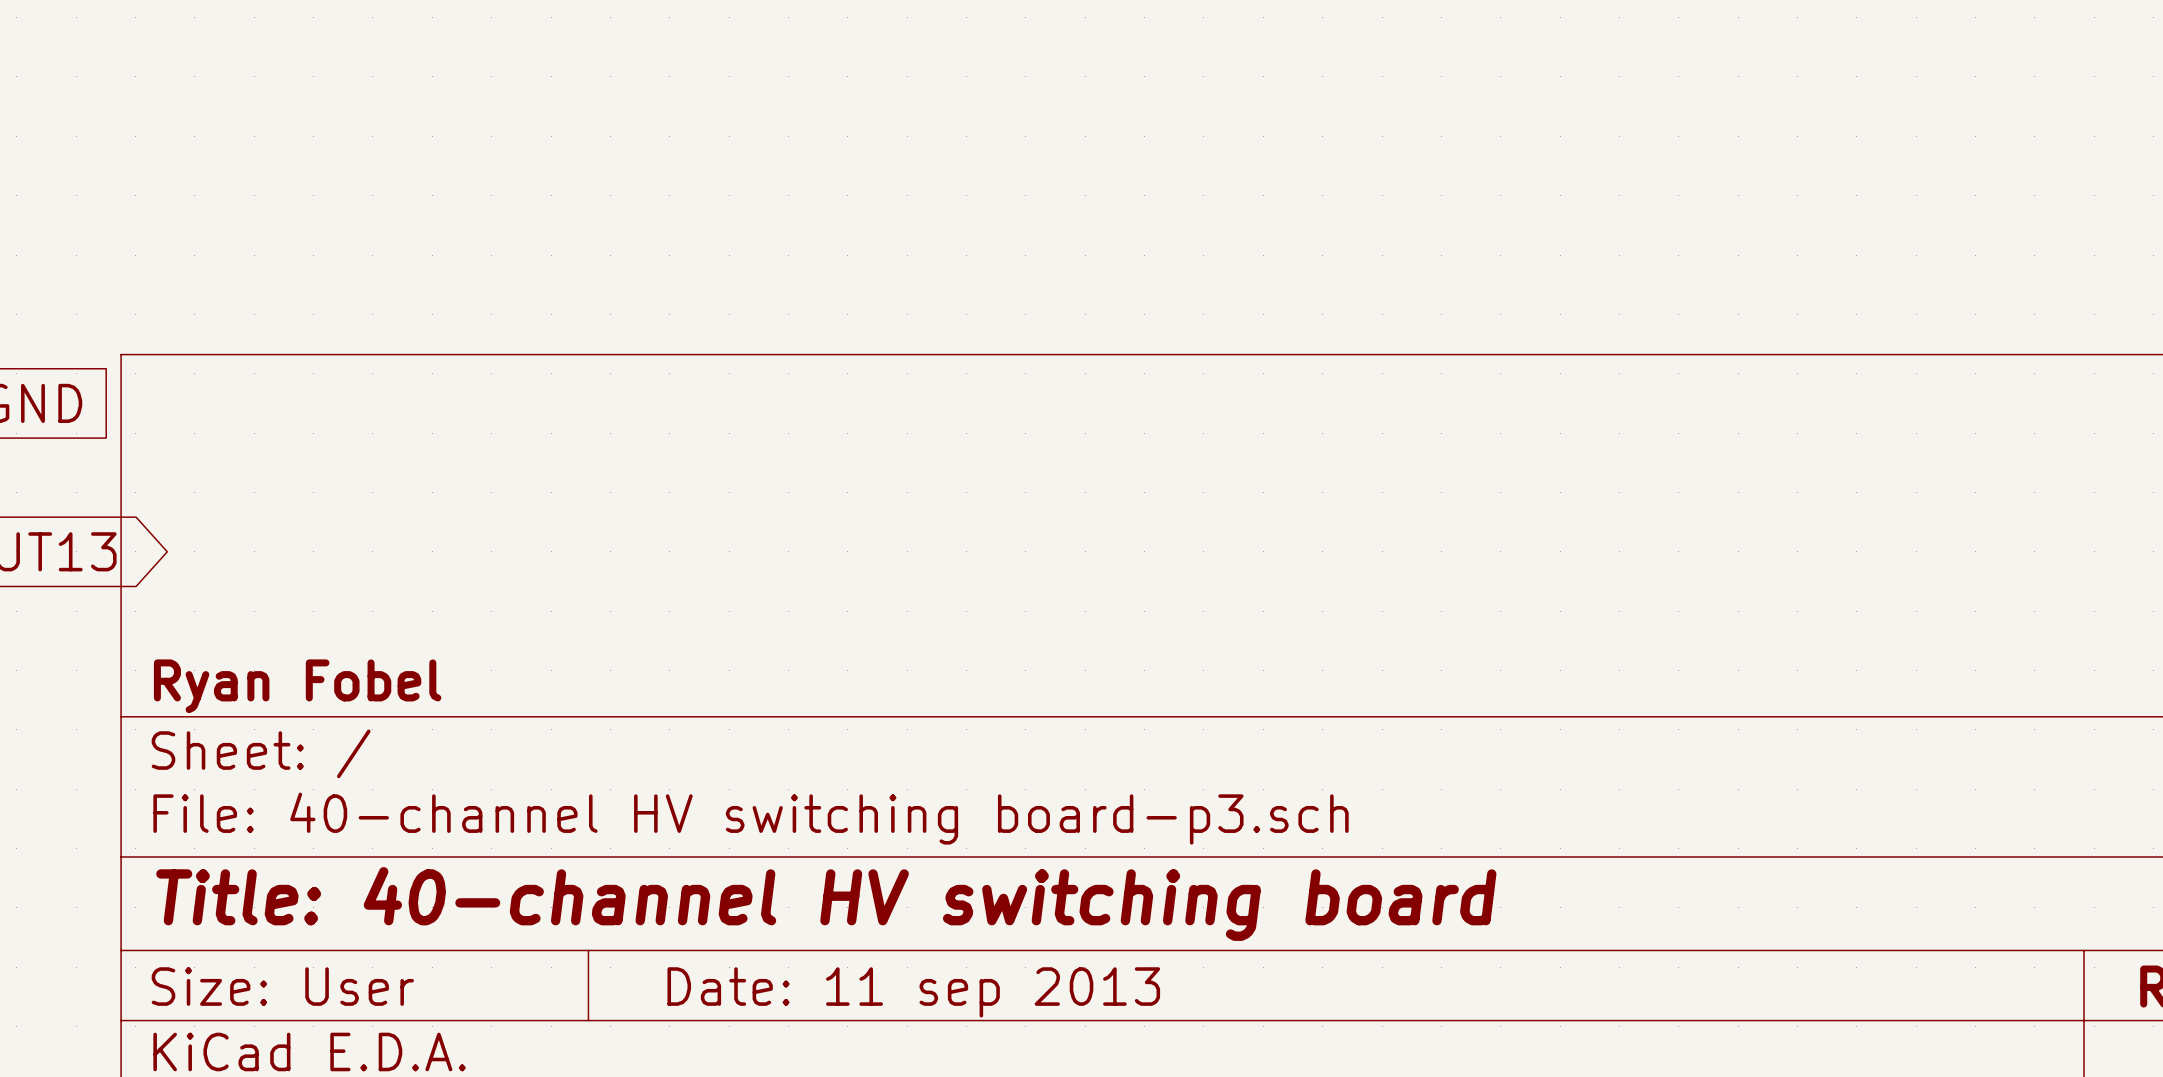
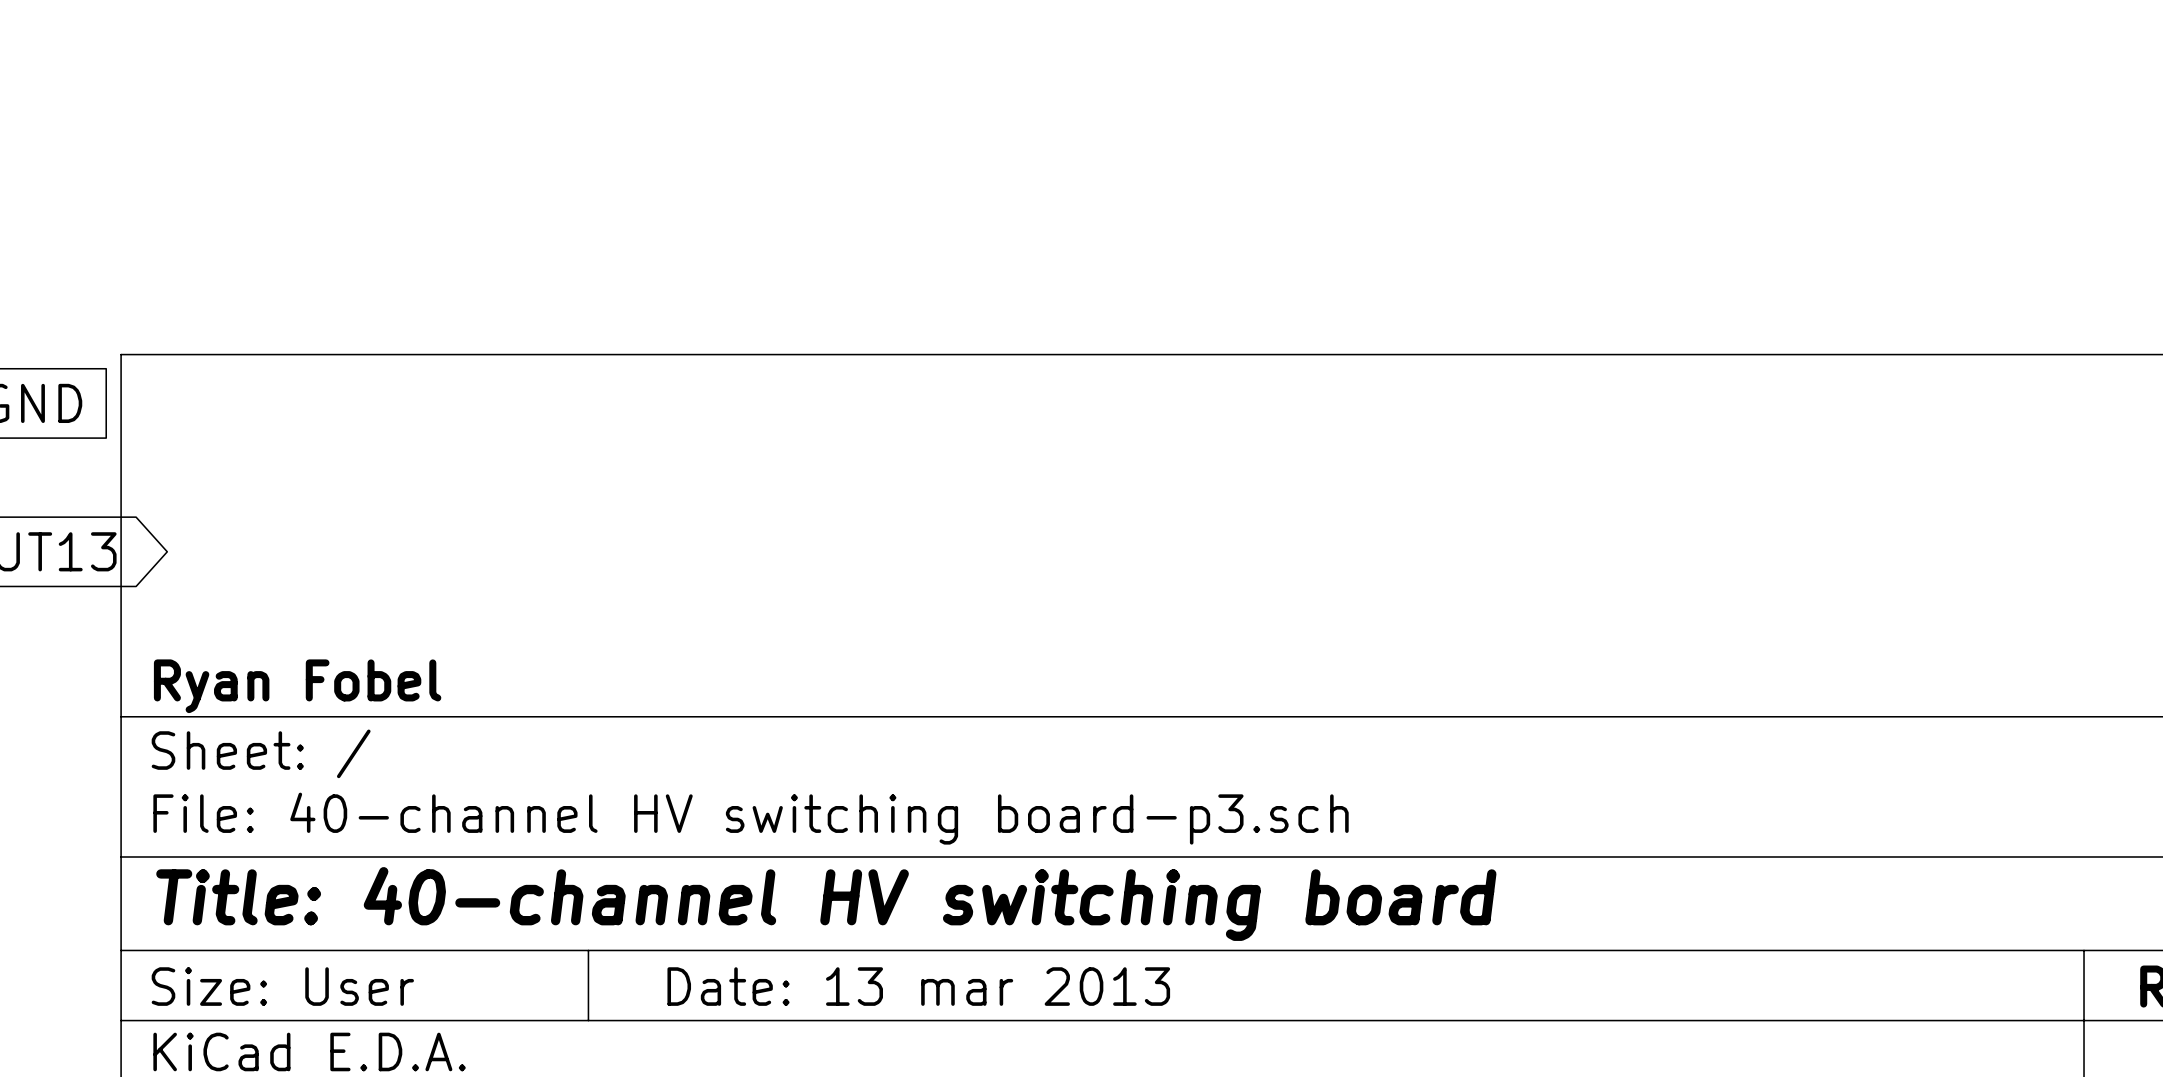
title block: Date: 11 sep 2013 (913, 992) -> Date: 13 mar 2013 (918, 986)

